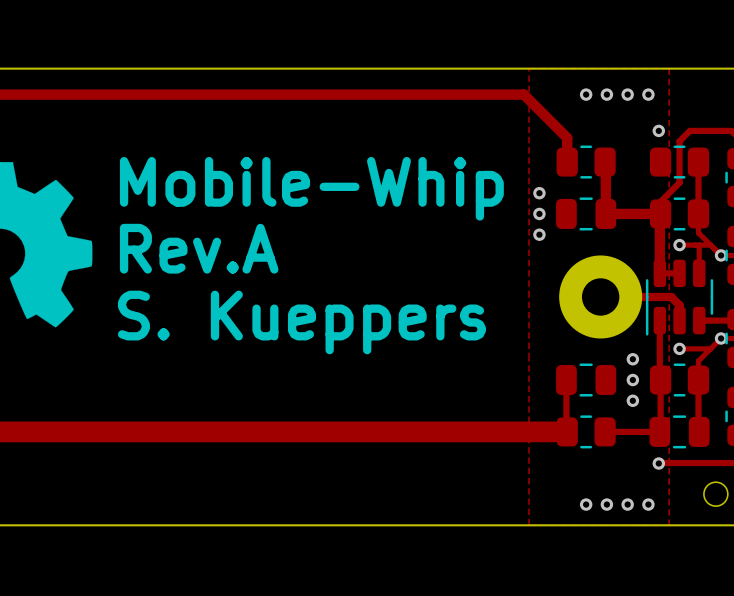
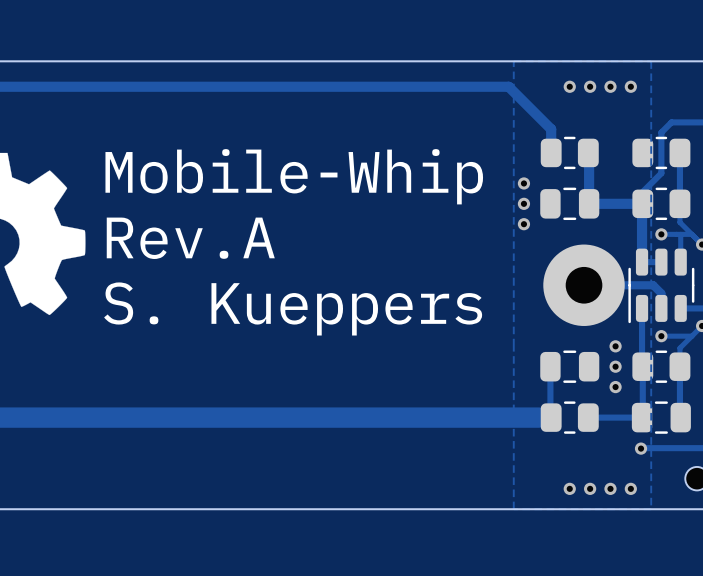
via: (658, 130) -> none

